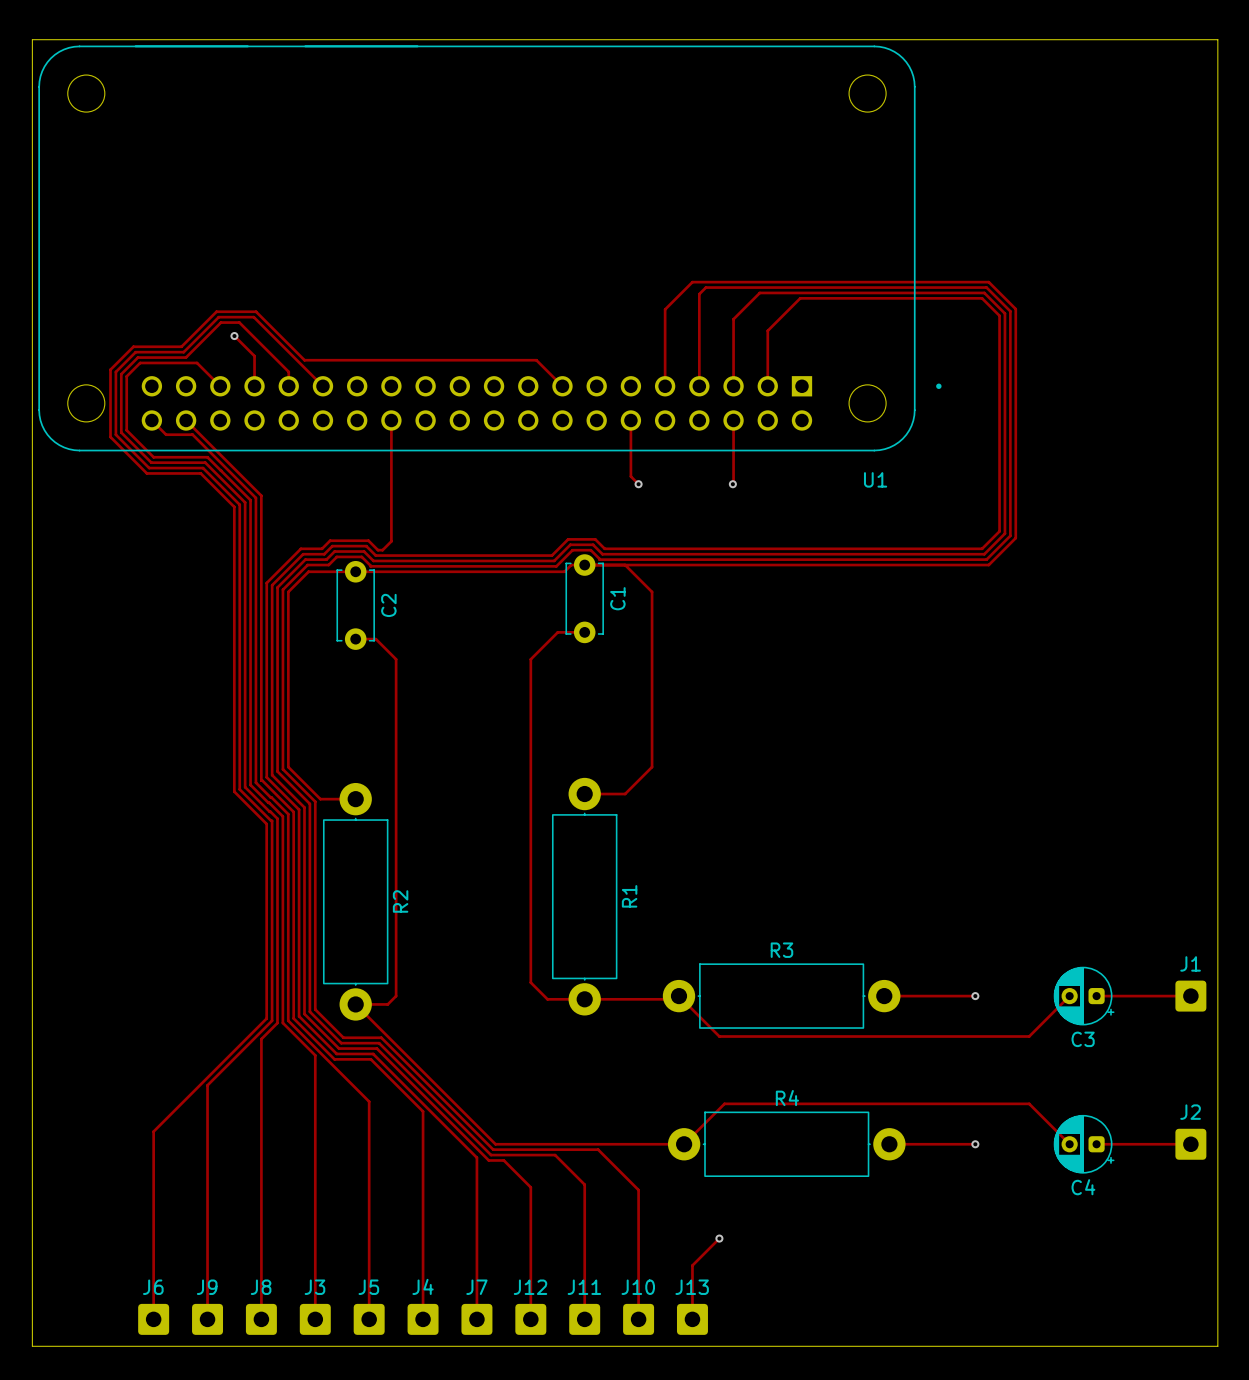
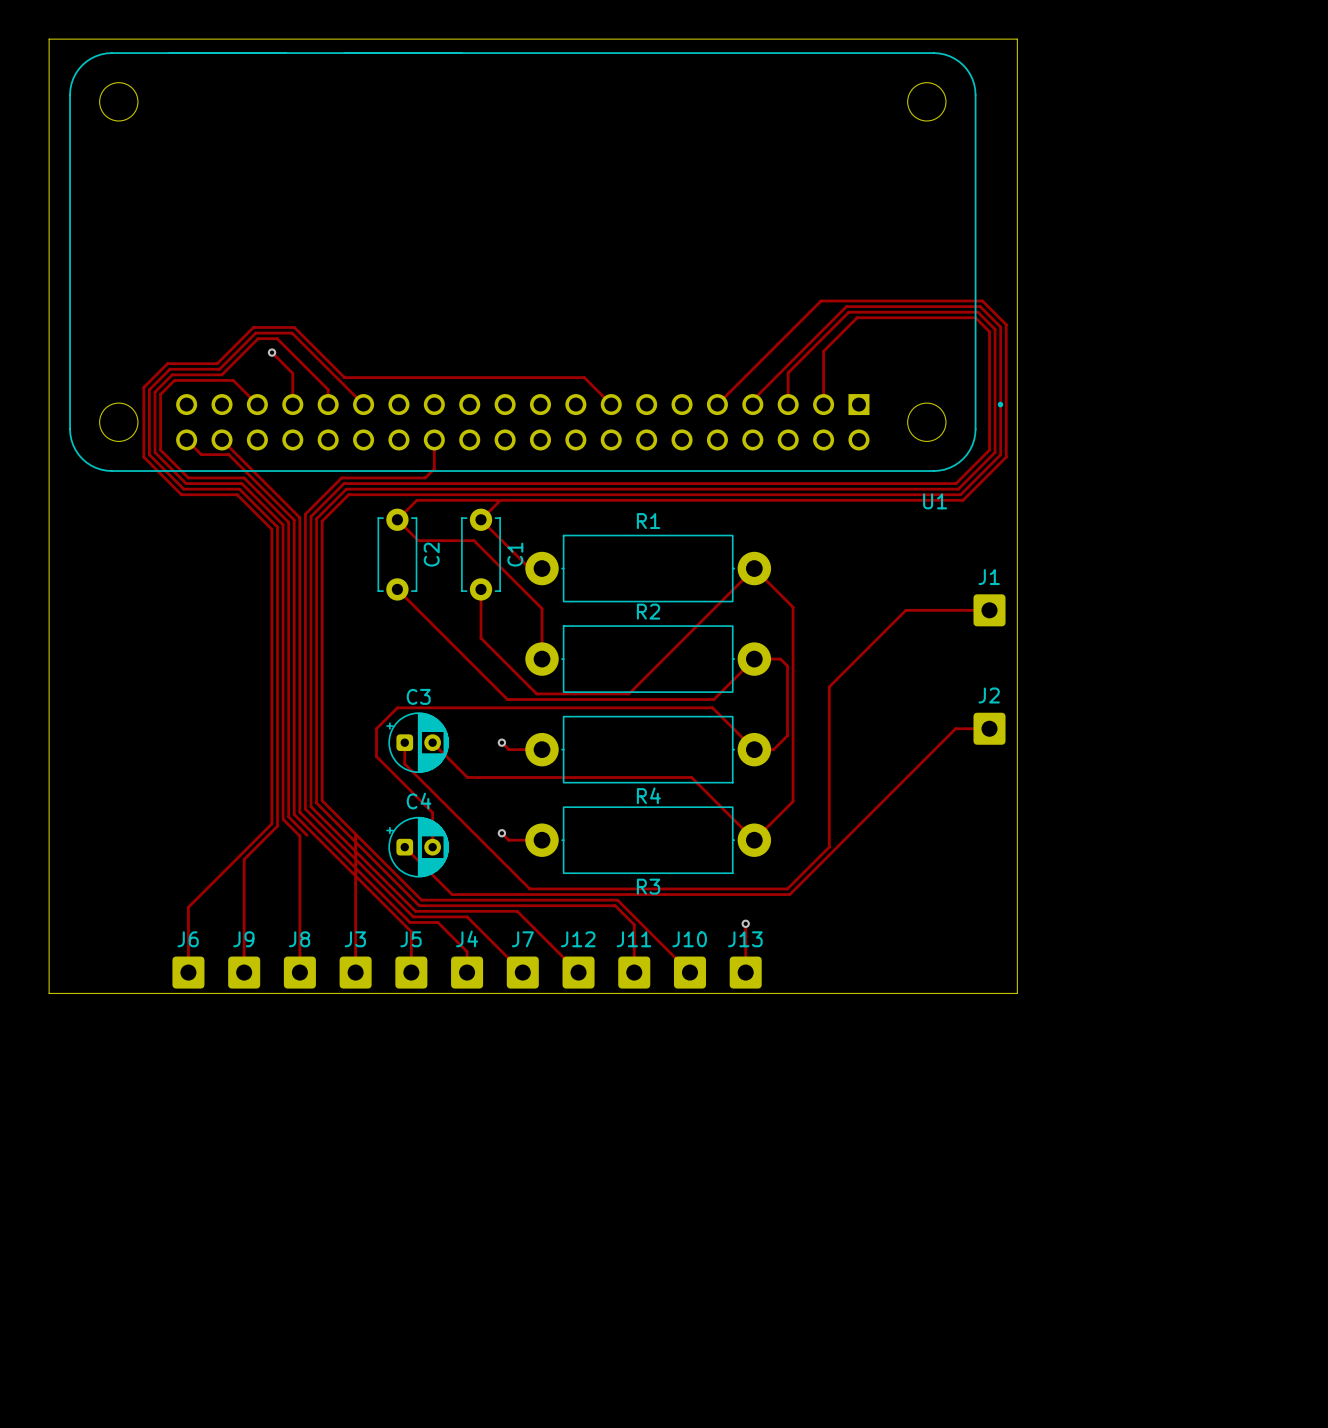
board edge: (32, 39) (1217, 39) (1217, 1346) (32, 1346) (32, 39) -> (49, 39) (49, 993) (1017, 993) (1017, 39) (49, 39)
track: (767, 334) (767, 330) (800, 298) (982, 298) (999, 315) (999, 531) (982, 548) (604, 548) (595, 539) (568, 539) (551, 555) (375, 555) (366, 546) (332, 546) (324, 554) (303, 554) (272, 585) -> (823, 351) (857, 317) (975, 317) (989, 331) (989, 450) (956, 483) (344, 483) (311, 516) (311, 610)
track: (733, 355) (733, 319) (759, 292) (984, 292) (1004, 313) (1004, 533) (984, 554) (602, 554) (593, 544) (570, 544) (554, 560) (373, 560) (364, 551) (334, 551) (326, 559) (305, 559) (277, 587) -> (788, 372) (848, 312) (977, 312) (995, 329) (995, 452) (958, 489) (346, 489) (316, 518) (316, 612)
track: (699, 382) (699, 294) (705, 287) (986, 287) (1010, 311) (1010, 535) (986, 559) (599, 559) (590, 550) (572, 550) (556, 566) (370, 566) (361, 556) (336, 556) (328, 565) (307, 565) (282, 589) -> (752, 400) (846, 306) (980, 306) (1000, 327) (1000, 454) (960, 494) (348, 494) (322, 521) (322, 614)
track: (665, 386) (665, 309) (692, 282) (988, 282) (1015, 309) (1015, 538) (988, 565) (571, 565) (564, 571) (308, 571) (288, 591) (288, 767) (320, 799) (355, 799) -> (717, 404) (820, 301) (982, 301) (1006, 324) (1006, 457) (963, 500) (416, 500) (397, 519) (418, 540) (474, 540) (542, 608) (542, 659)
track: (630, 420) (630, 476) (638, 484) -> none
track: (733, 420) (732, 484) -> none
track: (391, 448) (391, 541) (382, 550) (377, 550) (368, 540) (330, 540) (322, 548) (300, 548) (266, 583) -> (434, 468) (425, 477) (341, 477) (305, 514) (305, 608)
track: none -> (500, 500) (481, 519) (529, 568) (542, 568)
via: (638, 484) -> none
via: (732, 484) -> none
track: none -> (397, 589) (507, 699) (713, 699) (754, 659) (780, 659) (787, 666) (787, 735) (773, 749) (754, 749) (712, 707) (397, 707) (376, 728) (376, 756) (432, 812) (432, 847)
track: none -> (481, 589) (481, 638) (536, 693) (628, 693) (754, 568) (793, 607) (793, 801) (754, 840) (691, 777) (467, 777) (432, 742)
track: (625, 565) (652, 591) (652, 767) (625, 794) (584, 794) -> none
track: none -> (989, 610) (905, 610) (829, 686) (829, 847) (787, 888) (529, 888) (404, 763) (404, 742)
C1 position: (584, 598) -> (481, 554)
C2 position: (355, 605) -> (397, 554)
track: (584, 632) (557, 632) (530, 659) (530, 982) (547, 999) (675, 999) (679, 996) (719, 1036) (1029, 1036) (1069, 996) -> none
track: (355, 639) (375, 639) (396, 659) (396, 996) (387, 1004) (355, 1004) (495, 1144) (684, 1144) (724, 1103) (1029, 1103) (1069, 1144) -> none
track: none -> (989, 728) (955, 728) (789, 894) (452, 894) (404, 847)
track: none -> (501, 742) (508, 749) (542, 749)
via: none -> (501, 742)
track: (261, 780) (293, 811) (293, 1018) (334, 1059) (370, 1059) (423, 1111) (423, 1319) -> (299, 812) (410, 922) (437, 922) (467, 951) (467, 972)
track: (239, 789) (272, 820) (272, 1020) (207, 1085) (207, 1319) -> (277, 821) (277, 826) (244, 859) (244, 972)
track: (234, 791) (266, 824) (266, 1018) (153, 1131) (153, 1319) -> (271, 823) (188, 907) (188, 972)
track: (270, 797) (288, 814) (288, 1020) (369, 1101) (369, 1319) -> (309, 829) (411, 931) (411, 972)
track: none -> (501, 833) (508, 840) (542, 840)
via: none -> (501, 833)
track: none -> (355, 834) (421, 900) (617, 900) (689, 972)
track: (268, 802) (282, 816) (282, 1022) (315, 1055) (315, 1319) -> none
track: (261, 803) (277, 818) (277, 1023) (261, 1039) (261, 1319) -> (299, 836) (299, 972)
track: (309, 803) (309, 1011) (341, 1043) (379, 1043) (491, 1155) (555, 1155) (584, 1184) (584, 1319) -> (350, 836) (419, 905) (615, 905) (634, 924) (634, 972)
track: (304, 807) (304, 1014) (339, 1048) (376, 1048) (488, 1160) (503, 1160) (530, 1187) (530, 1319) -> (344, 840) (415, 911) (517, 911) (578, 972)
track: (299, 809) (299, 1016) (336, 1053) (373, 1053) (476, 1157) (476, 1319) -> (338, 842) (413, 916) (467, 916) (522, 972)
track: none -> (745, 923) (745, 972)
via: none -> (745, 923)
R1 rotation: 0° (584, 896) -> 90° clockwise (648, 568)
R1 position: (584, 896) -> (648, 568)
R1 name position: R1 (629, 896) -> R1 (648, 521)
R2 rotation: 0° (355, 901) -> 90° clockwise (648, 659)
R2 position: (355, 901) -> (648, 659)
R2 name position: R2 (400, 901) -> R2 (648, 611)
track: (315, 935) (315, 1009) (343, 1037) (381, 1037) (493, 1149) (598, 1149) (638, 1190) (638, 1319) -> none
R3 name position: R3 (781, 950) -> R3 (648, 886)
R3 position: (781, 996) -> (648, 840)
track: (884, 996) (975, 996) -> none
via: (975, 996) -> none
C3 rotation: 0° (1084, 996) -> 180° (417, 742)
C3 position: (1084, 996) -> (417, 742)
track: (1096, 996) (1190, 996) -> none
J1 position: (1190, 996) -> (989, 610)
R4 name position: R4 (787, 1098) -> R4 (648, 795)
R4 position: (786, 1144) -> (648, 749)
track: (889, 1144) (975, 1144) -> none
via: (975, 1144) -> none
C4 rotation: 0° (1084, 1144) -> 180° (417, 847)
C4 position: (1084, 1144) -> (417, 847)
track: (1096, 1144) (1190, 1144) -> none
J2 position: (1190, 1144) -> (989, 728)
track: (719, 1238) (692, 1265) (692, 1319) -> none
via: (719, 1238) -> none
J6 position: (153, 1319) -> (188, 972)
J9 position: (207, 1319) -> (244, 972)
J8 position: (261, 1319) -> (299, 972)
J3 position: (315, 1319) -> (355, 972)
J5 position: (369, 1319) -> (411, 972)
J4 position: (423, 1319) -> (467, 972)
J7 position: (476, 1319) -> (522, 972)
J12 position: (530, 1319) -> (578, 972)
J11 position: (584, 1319) -> (634, 972)
J10 position: (638, 1319) -> (689, 972)
J13 position: (692, 1319) -> (745, 972)

